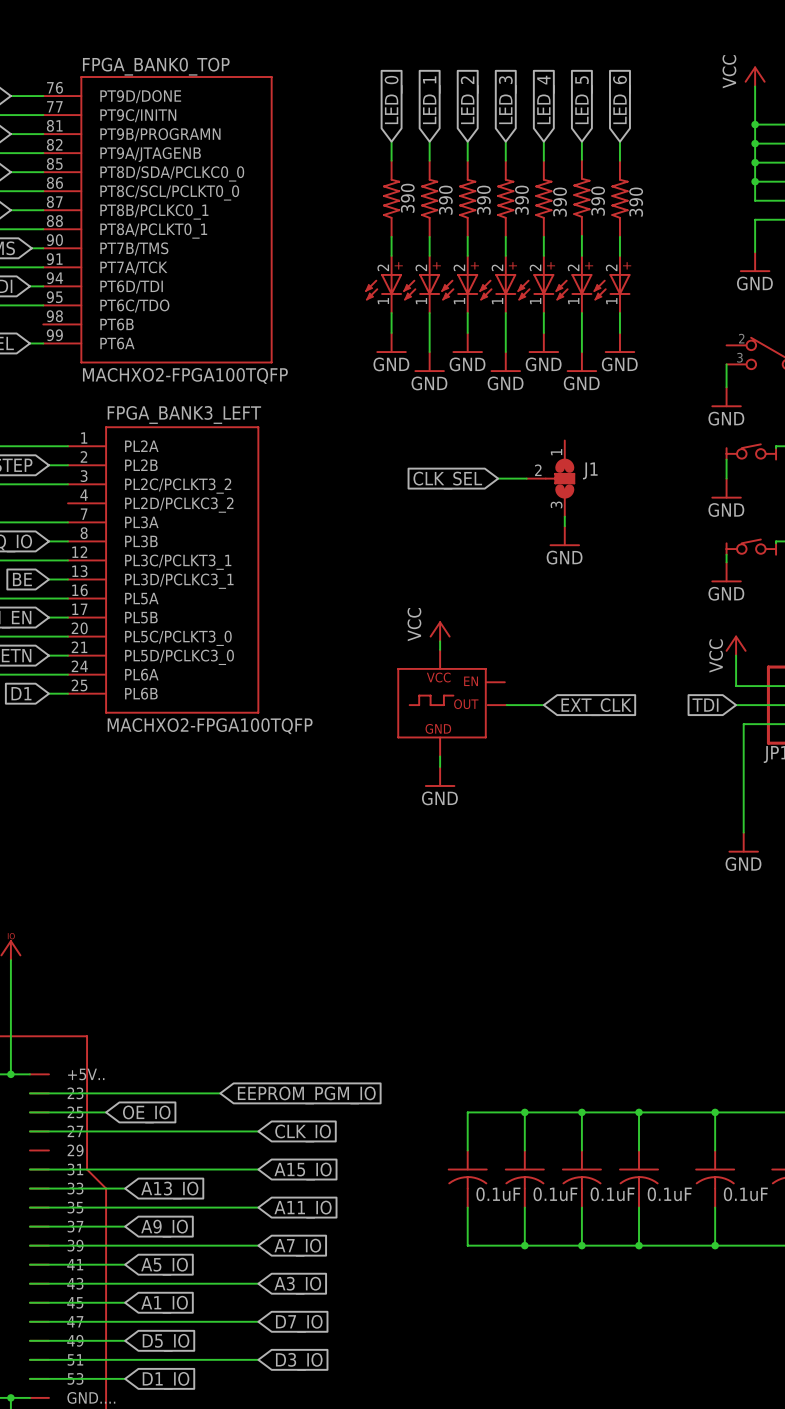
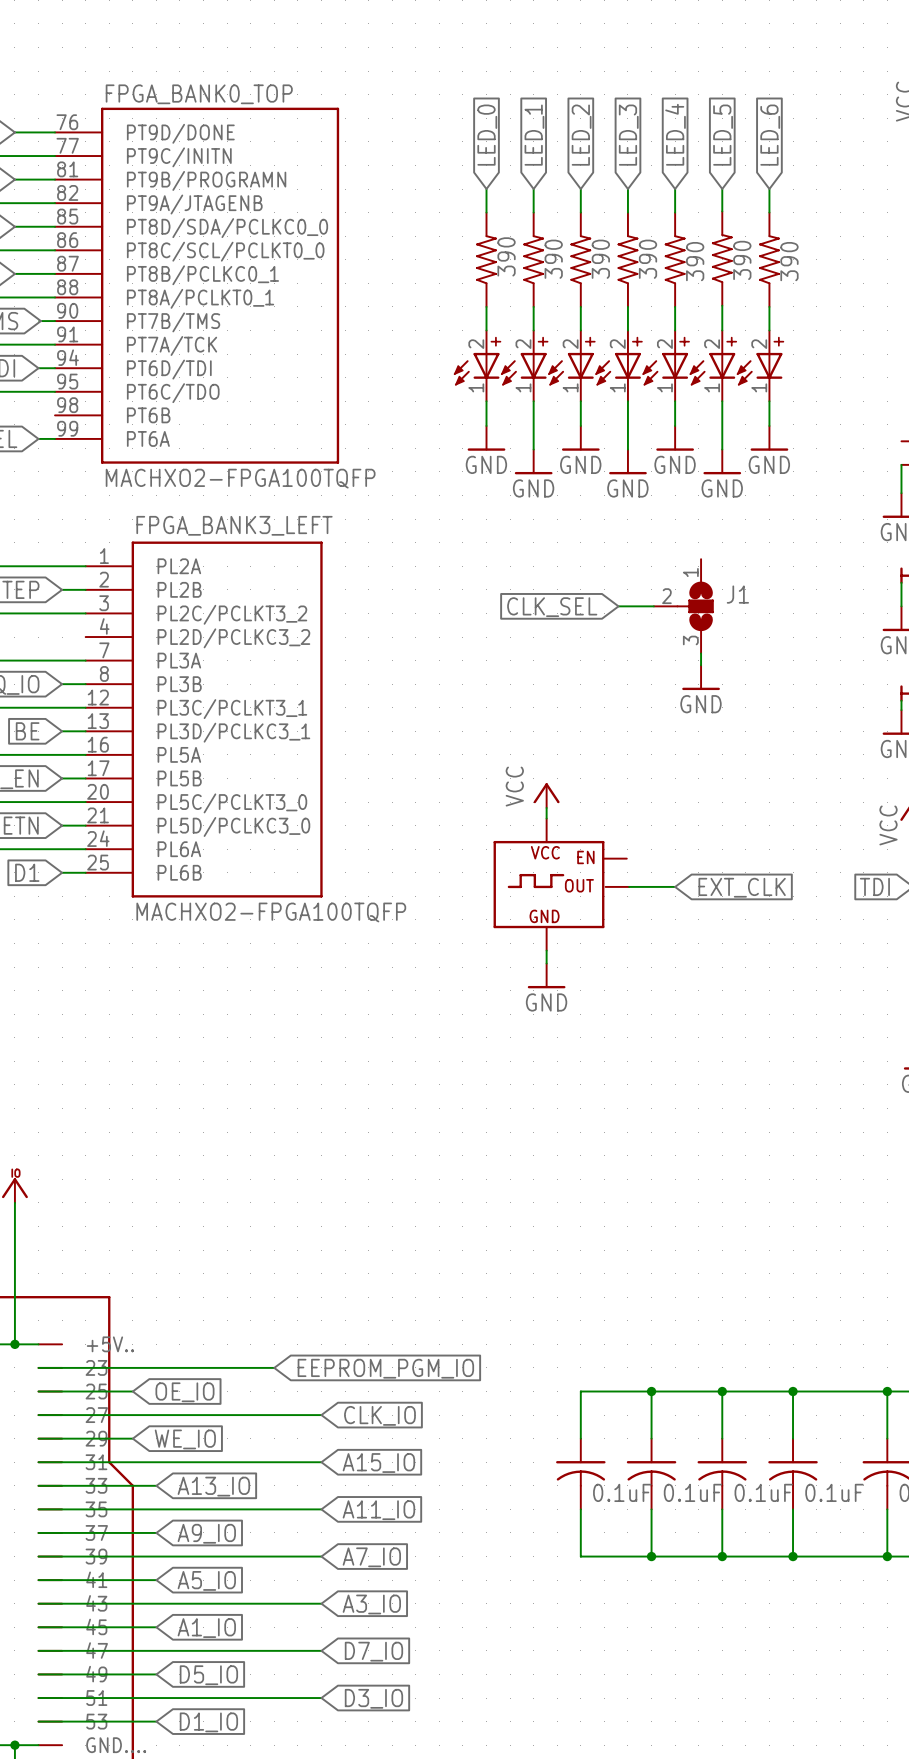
wire: none -> (38, 1438) (132, 1438)
global label: none -> WE_IO (185, 1439)

